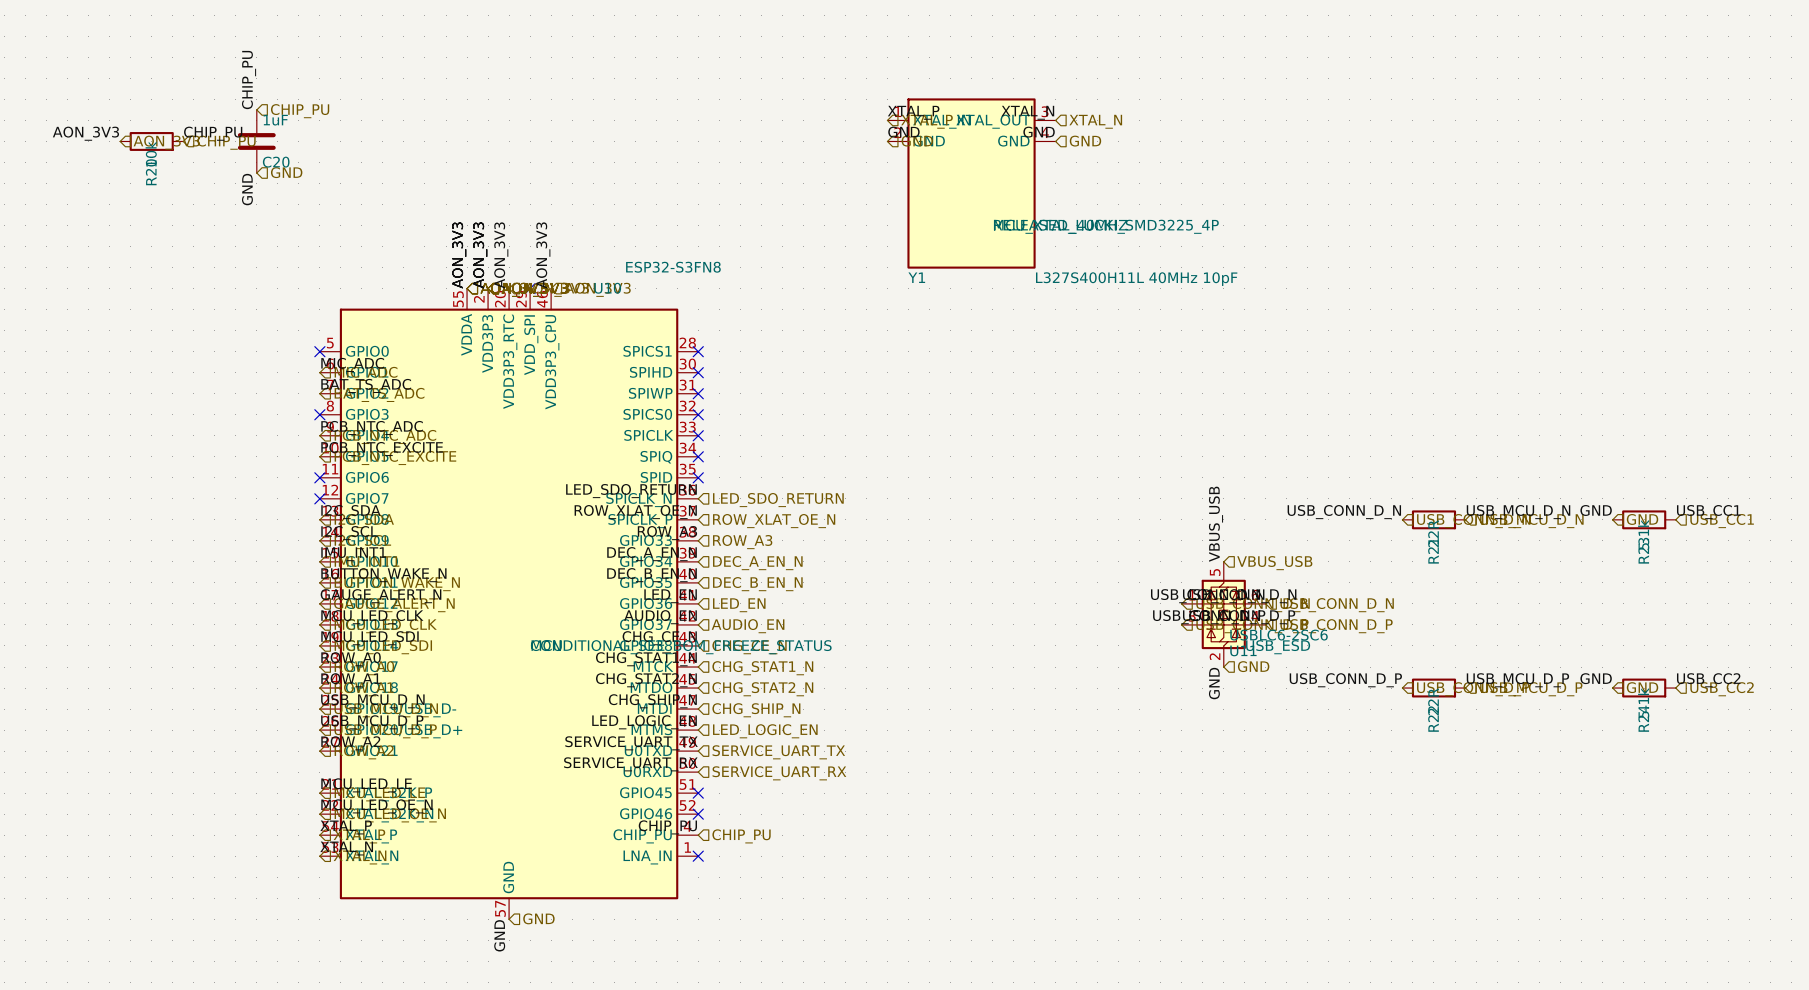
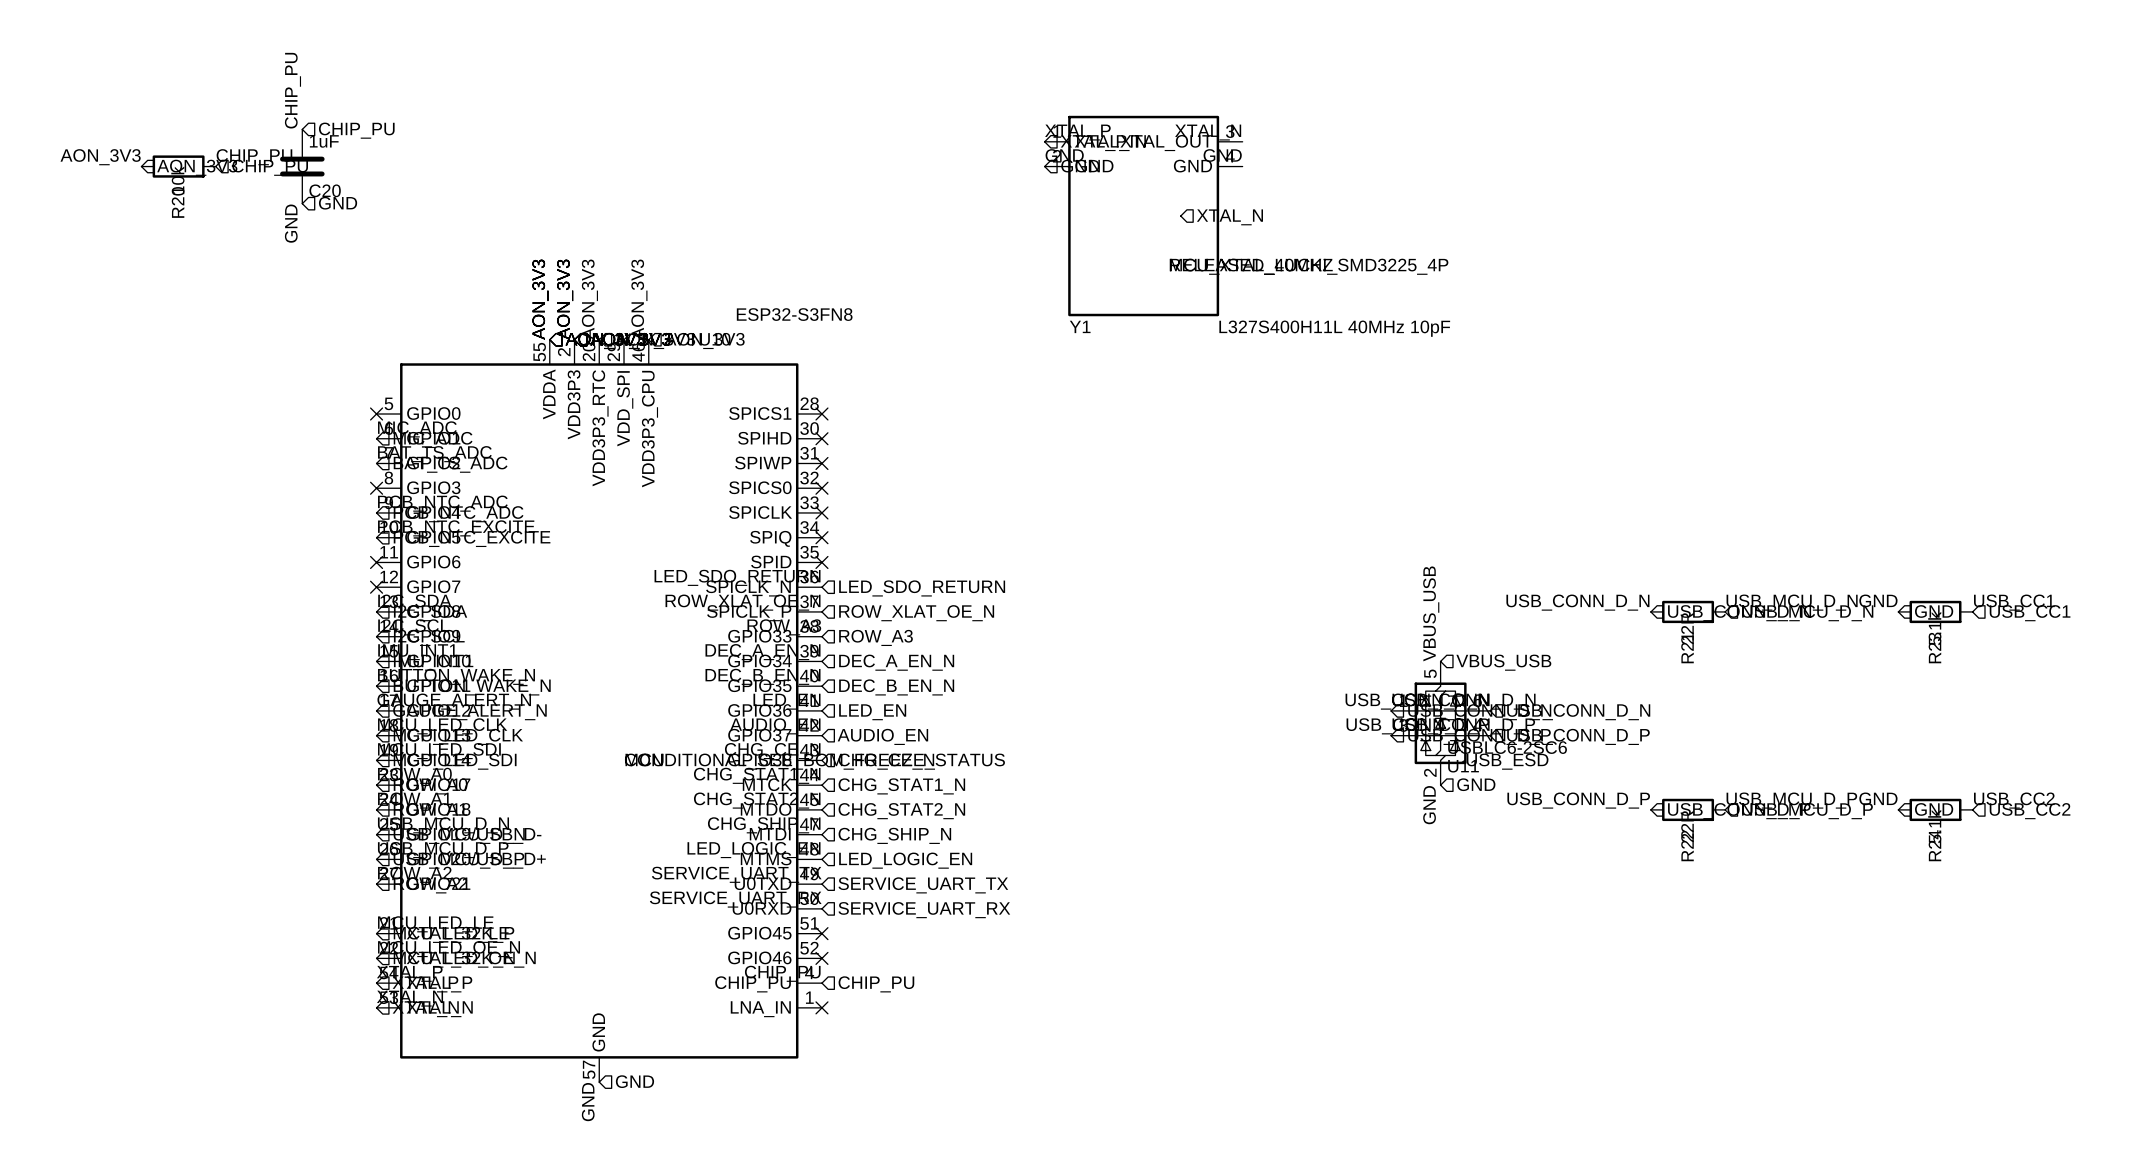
hierarchical label position: XTAL_N (1095, 121) -> XTAL_N (1229, 217)
hierarchical label: GND (1085, 141) -> none

